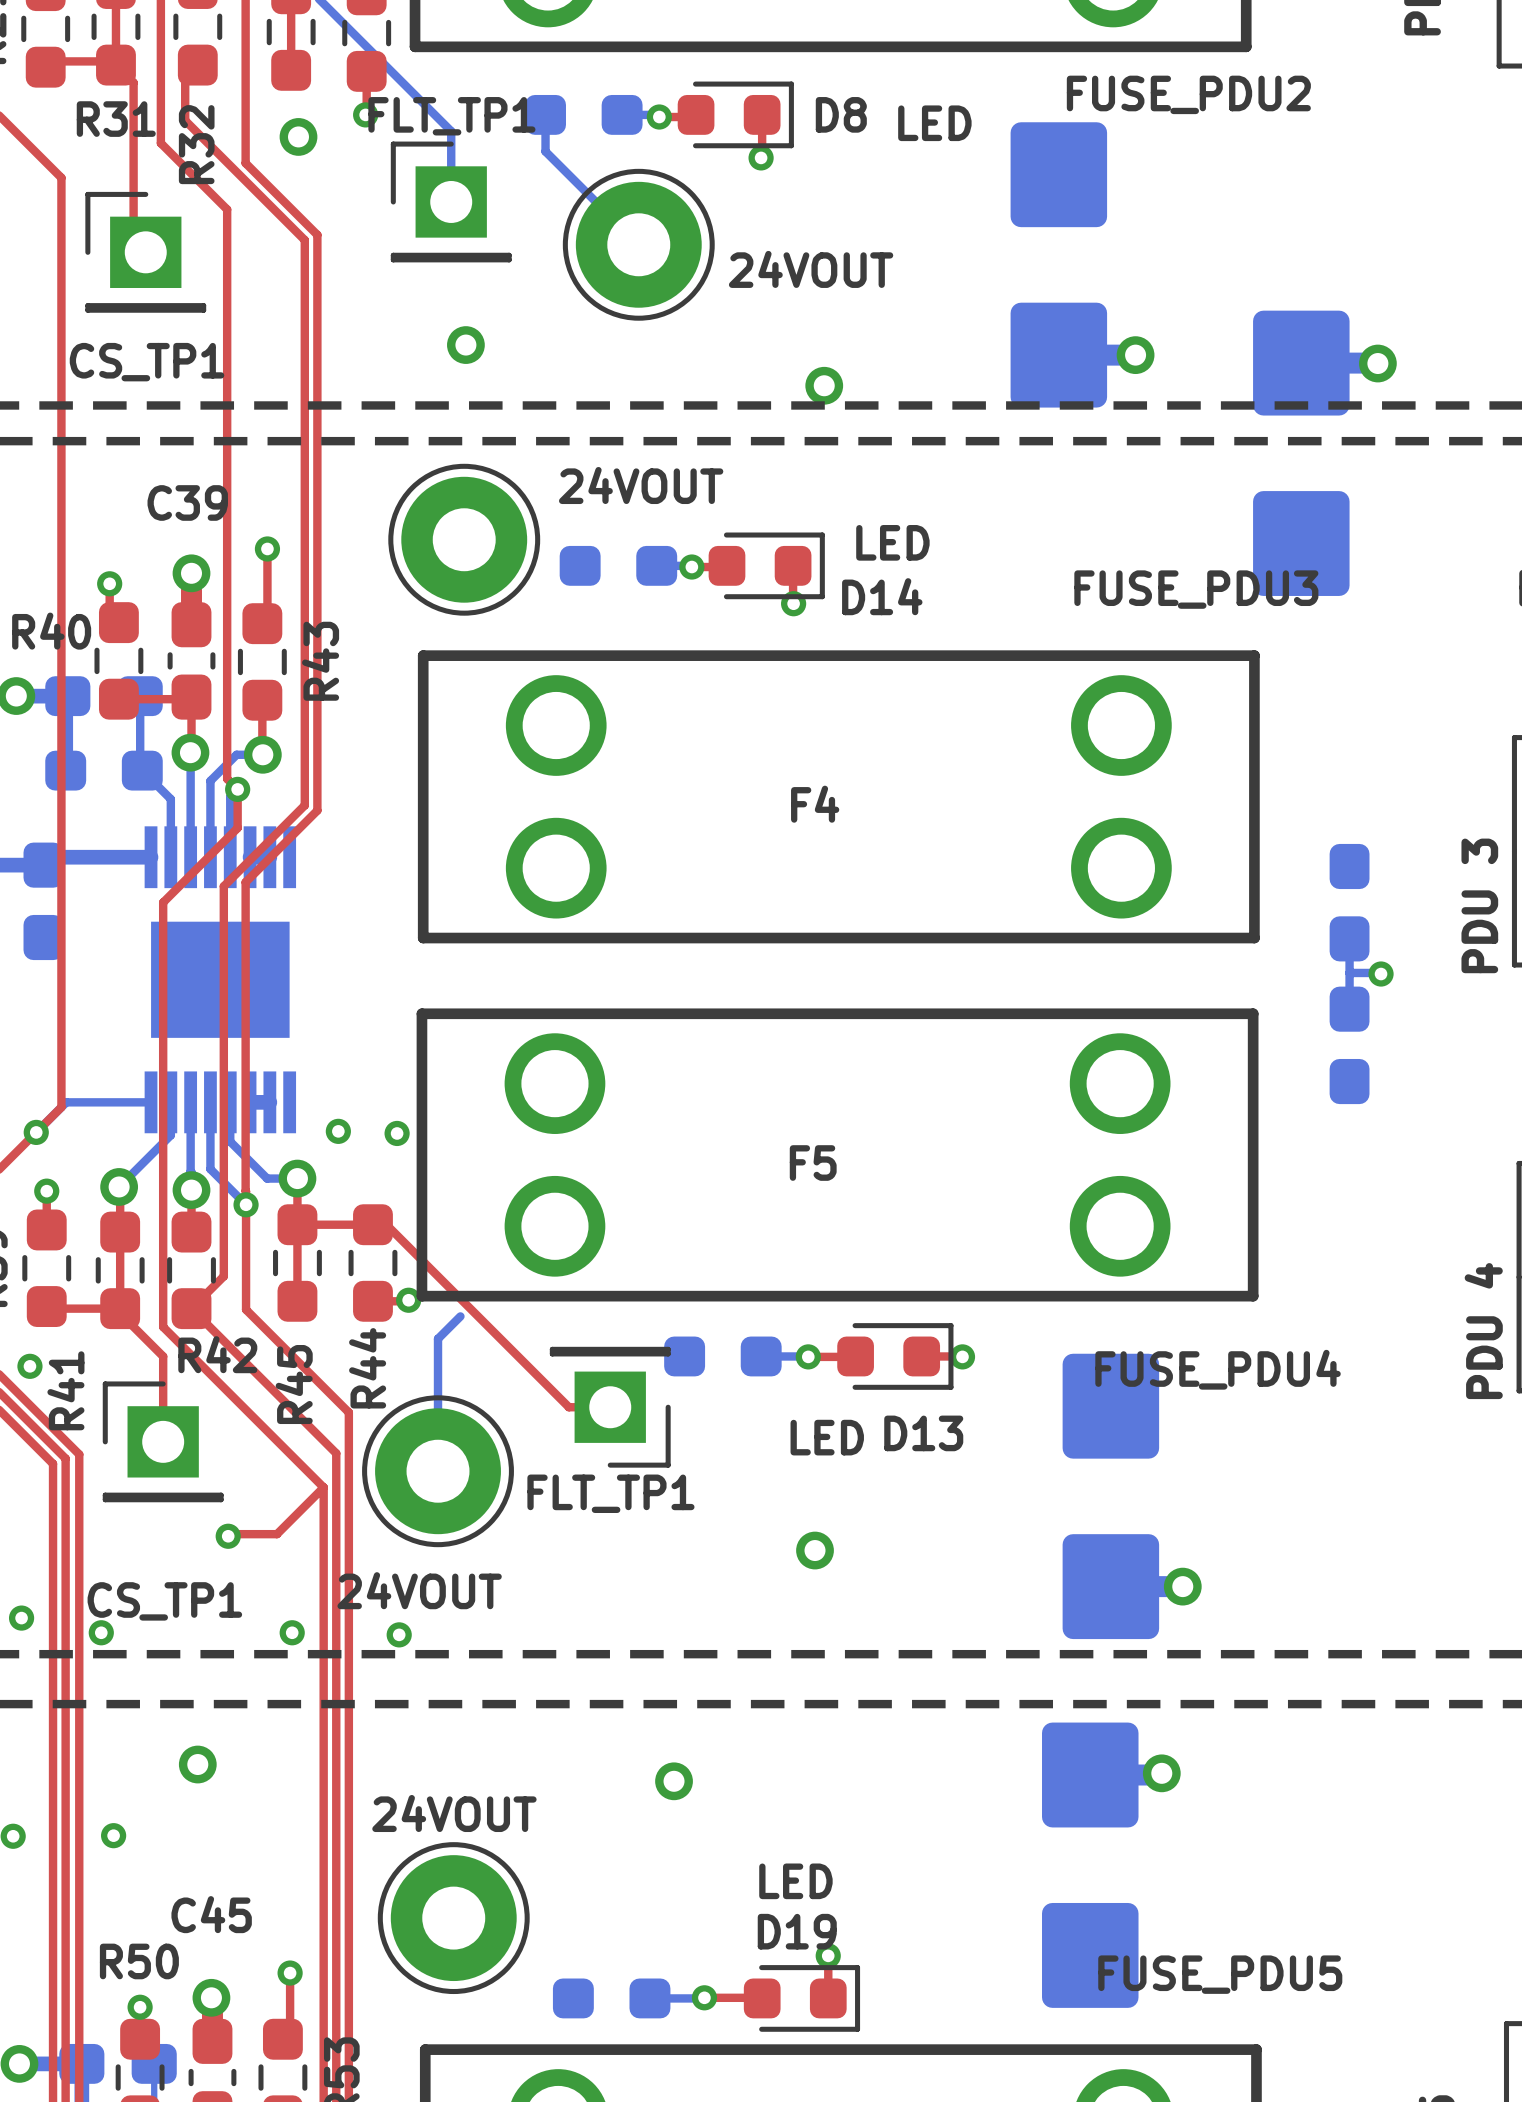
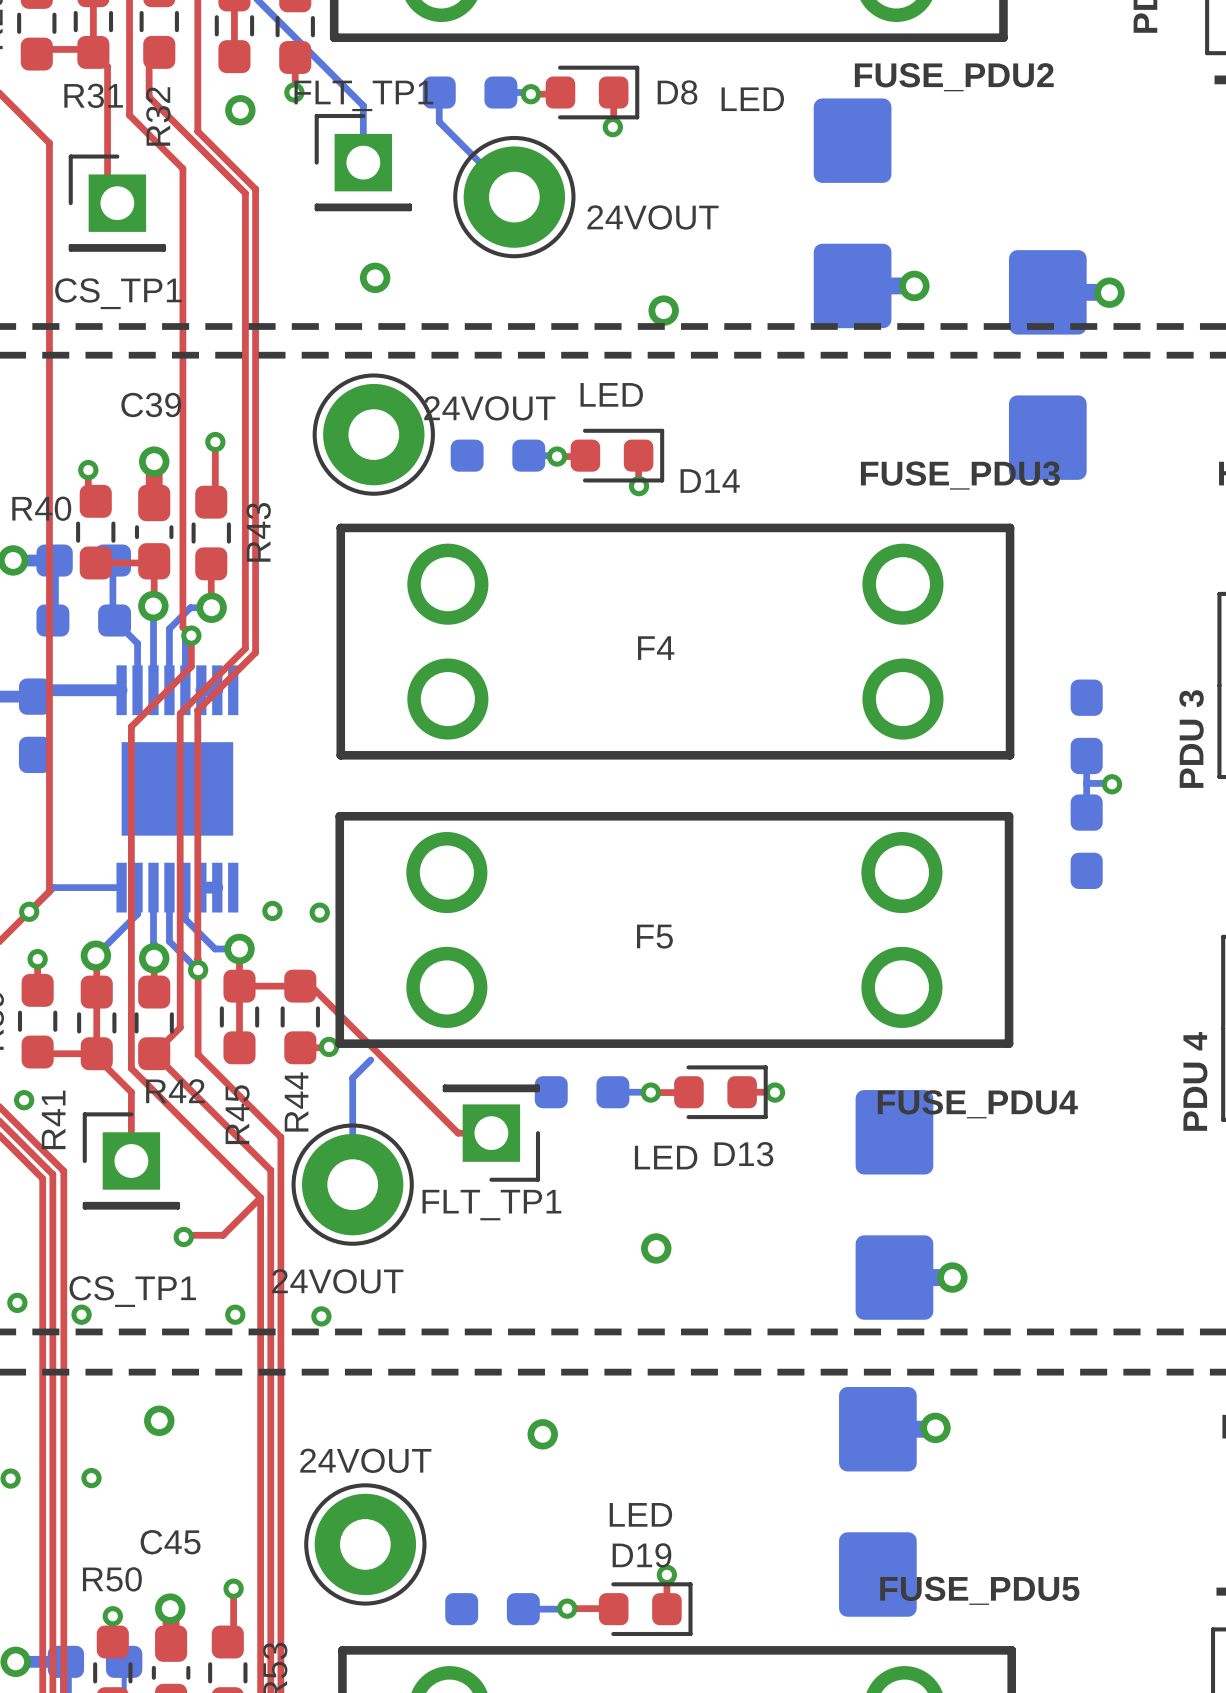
part value position: 24VOUT (641, 485) -> 24VOUT (489, 408)
D14 value position: LED (892, 542) -> LED (611, 394)

